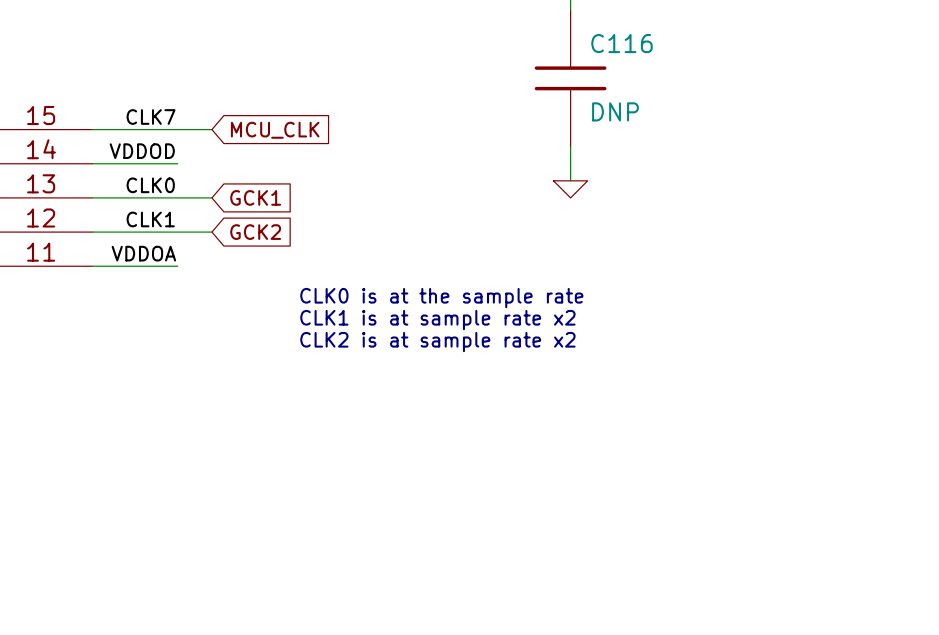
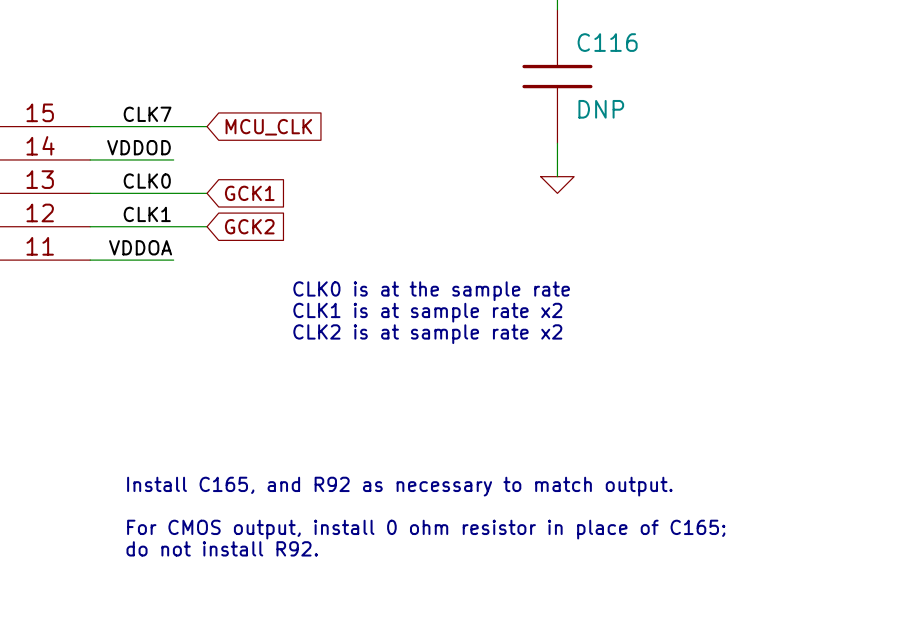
text: none -> Install C165, and R92 as necessary to match output. (399, 486)
text: none -> For CMOS output, install 0 ohm resistor in place of C165; (426, 529)
text: none -> do not install R92. (222, 548)

